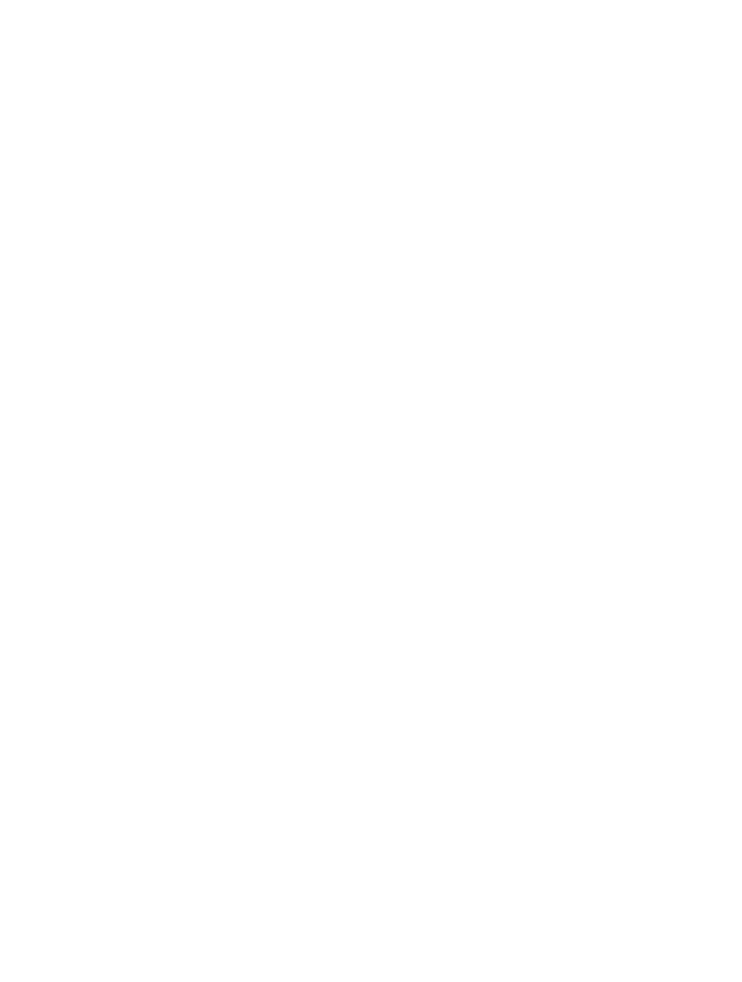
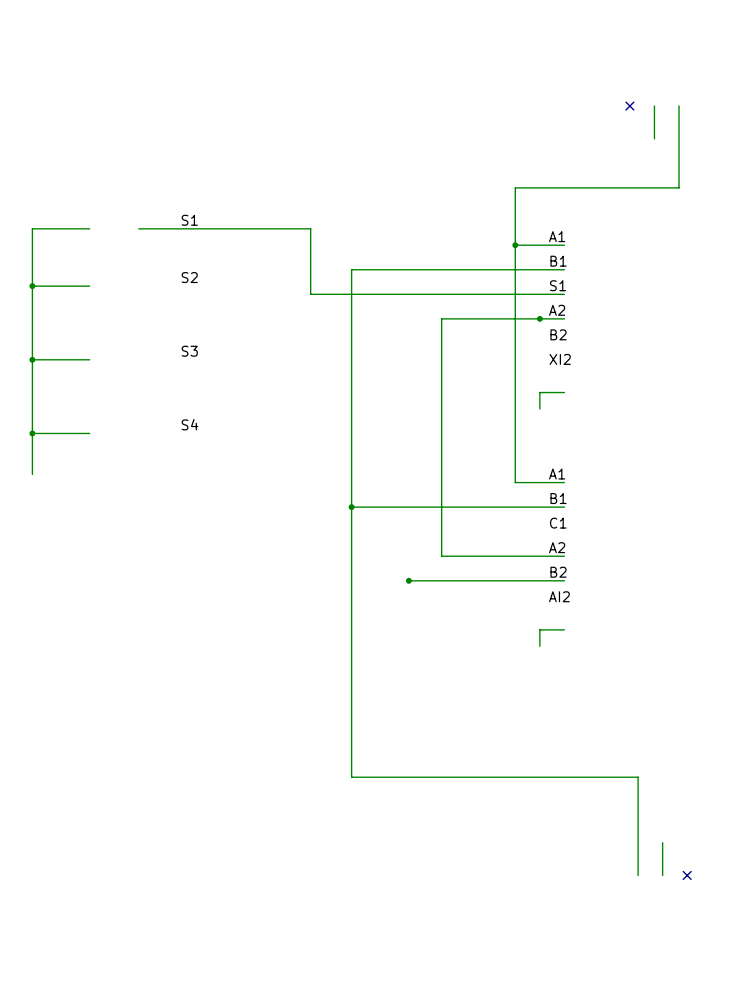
no-connect mark: none -> (629, 106)
wire: none -> (654, 106) (654, 138)
wire: none -> (679, 106) (679, 187) (515, 187) (515, 482) (564, 482)
label: none -> S1 (189, 220)
wire: none -> (89, 228) (32, 228) (32, 474)
wire: none -> (138, 228) (310, 228) (310, 294) (564, 294)
label: none -> A1 (557, 236)
wire: none -> (515, 245) (564, 245)
junction: none -> (515, 245)
label: none -> B1 (558, 261)
wire: none -> (564, 269) (351, 269) (351, 777) (638, 777) (638, 875)
label: none -> S2 (189, 277)
label: none -> S1 (558, 285)
wire: none -> (32, 286) (89, 286)
junction: none -> (32, 286)
label: none -> A2 (557, 310)
junction: none -> (539, 318)
wire: none -> (564, 318) (441, 318) (441, 556) (564, 556)
label: none -> B2 (558, 334)
label: none -> S3 (189, 351)
wire: none -> (32, 359) (89, 359)
junction: none -> (32, 359)
label: none -> XI2 (560, 359)
wire: none -> (564, 392) (539, 392) (539, 408)
label: none -> S4 (189, 424)
wire: none -> (32, 433) (89, 433)
junction: none -> (32, 433)
label: none -> A1 (557, 474)
label: none -> B1 (558, 498)
wire: none -> (351, 507) (564, 507)
junction: none -> (351, 507)
label: none -> C1 (558, 523)
label: none -> A2 (557, 547)
label: none -> B2 (558, 572)
wire: none -> (408, 580) (564, 580)
junction: none -> (408, 580)
label: none -> AI2 (559, 596)
wire: none -> (564, 629) (539, 629) (539, 646)
wire: none -> (662, 842) (662, 875)
no-connect mark: none -> (687, 875)

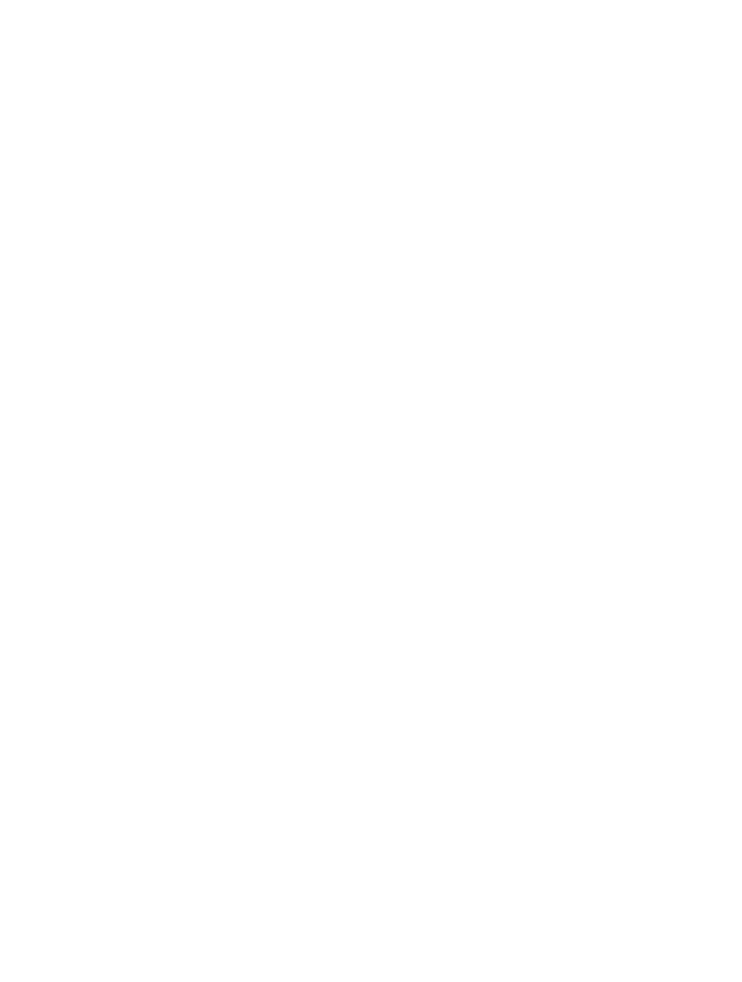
no-connect mark: (629, 106) -> none
wire: (654, 106) (654, 138) -> none
wire: (679, 106) (679, 187) (515, 187) (515, 482) (564, 482) -> none
label: S1 (189, 220) -> none
wire: (89, 228) (32, 228) (32, 474) -> none
wire: (138, 228) (310, 228) (310, 294) (564, 294) -> none
label: A1 (557, 236) -> none
wire: (515, 245) (564, 245) -> none
junction: (515, 245) -> none
label: B1 (558, 261) -> none
wire: (564, 269) (351, 269) (351, 777) (638, 777) (638, 875) -> none
label: S2 (189, 277) -> none
label: S1 (558, 285) -> none
wire: (32, 286) (89, 286) -> none
junction: (32, 286) -> none
label: A2 (557, 310) -> none
junction: (539, 318) -> none
wire: (564, 318) (441, 318) (441, 556) (564, 556) -> none
label: B2 (558, 334) -> none
label: S3 (189, 351) -> none
wire: (32, 359) (89, 359) -> none
junction: (32, 359) -> none
label: XI2 (560, 359) -> none
wire: (564, 392) (539, 392) (539, 408) -> none
label: S4 (189, 424) -> none
wire: (32, 433) (89, 433) -> none
junction: (32, 433) -> none
label: A1 (557, 474) -> none
label: B1 (558, 498) -> none
wire: (351, 507) (564, 507) -> none
junction: (351, 507) -> none
label: C1 (558, 523) -> none
label: A2 (557, 547) -> none
label: B2 (558, 572) -> none
wire: (408, 580) (564, 580) -> none
junction: (408, 580) -> none
label: AI2 (559, 596) -> none
wire: (564, 629) (539, 629) (539, 646) -> none
wire: (662, 842) (662, 875) -> none
no-connect mark: (687, 875) -> none

